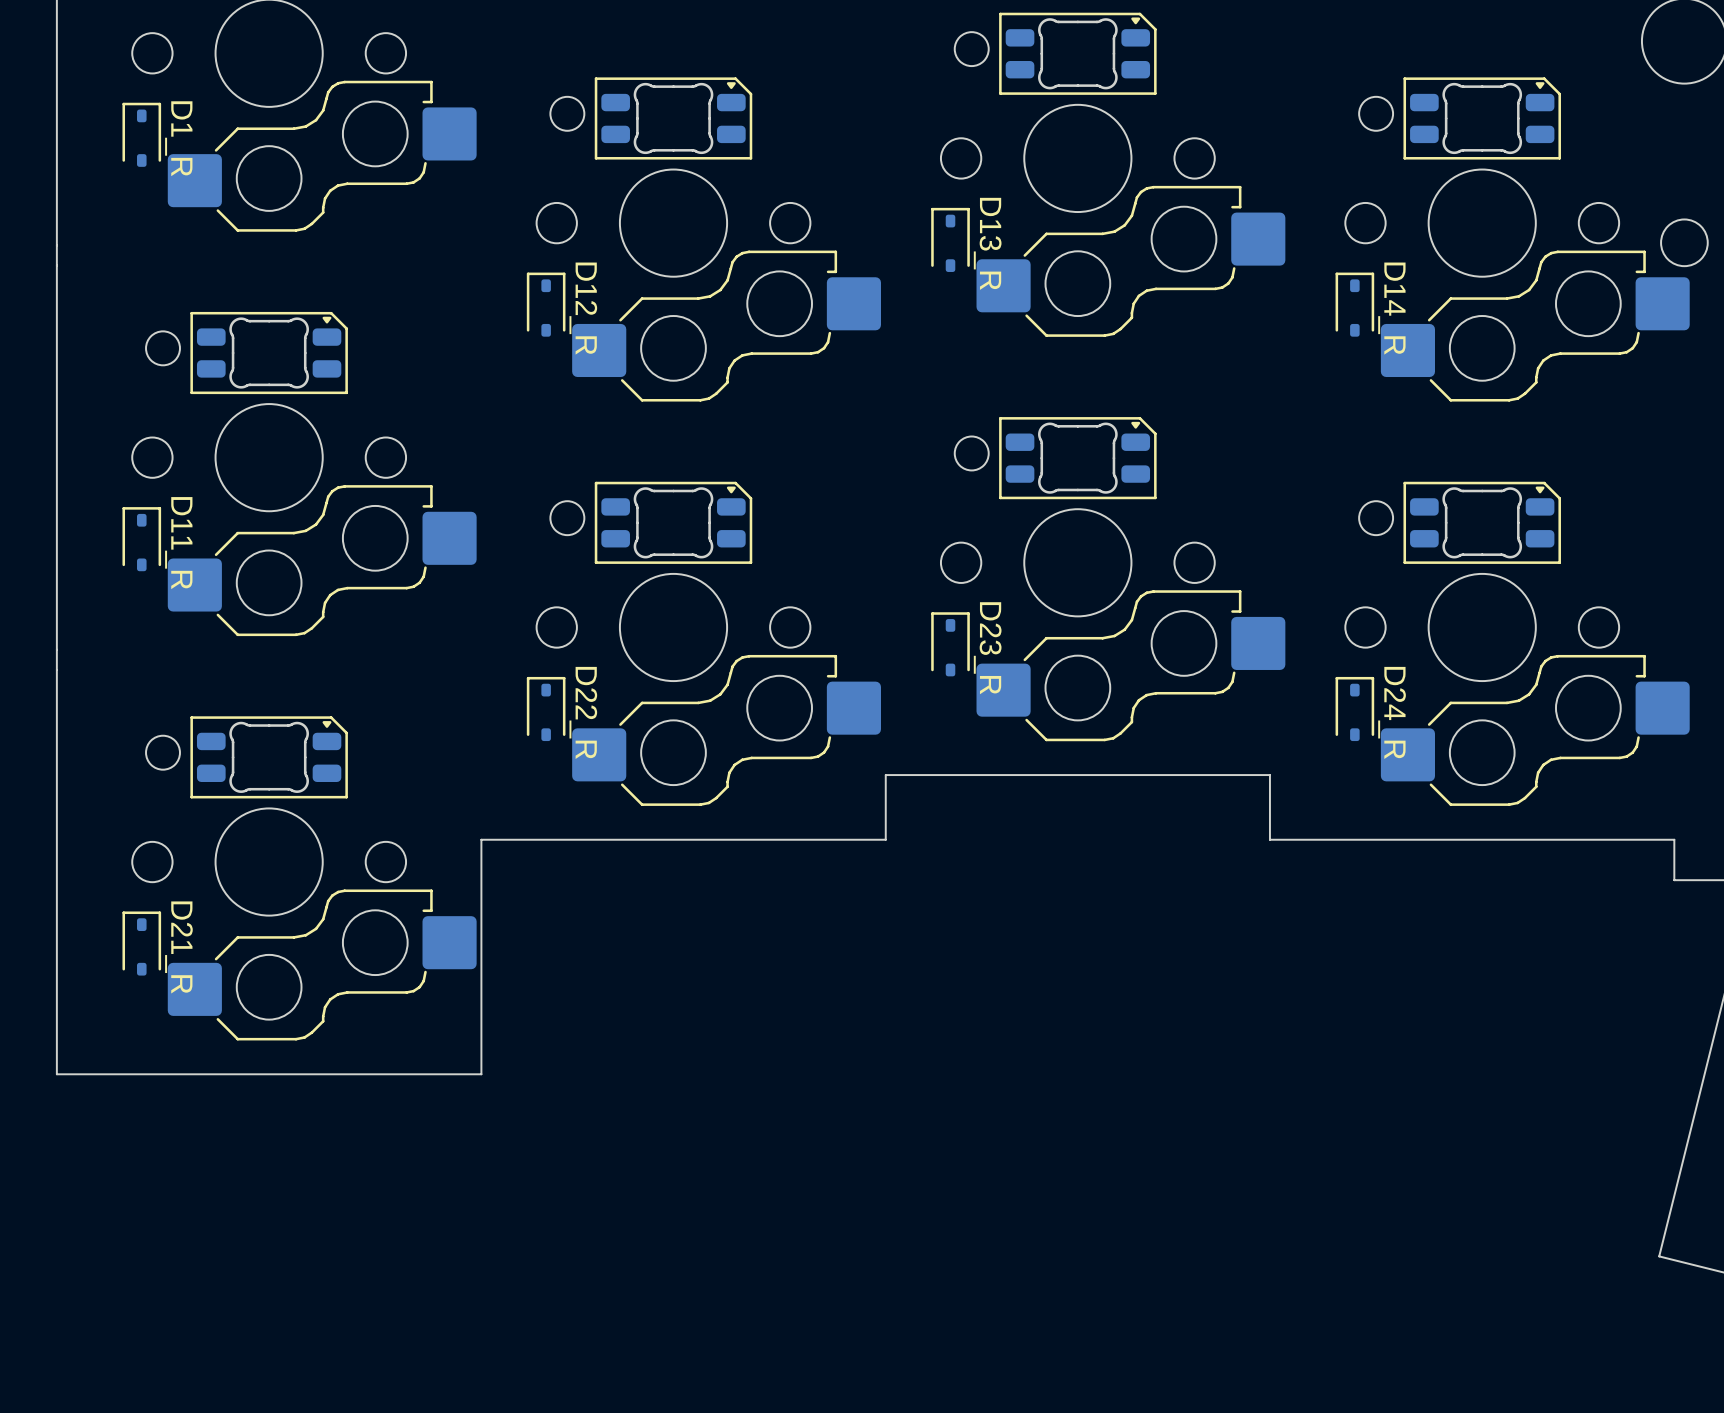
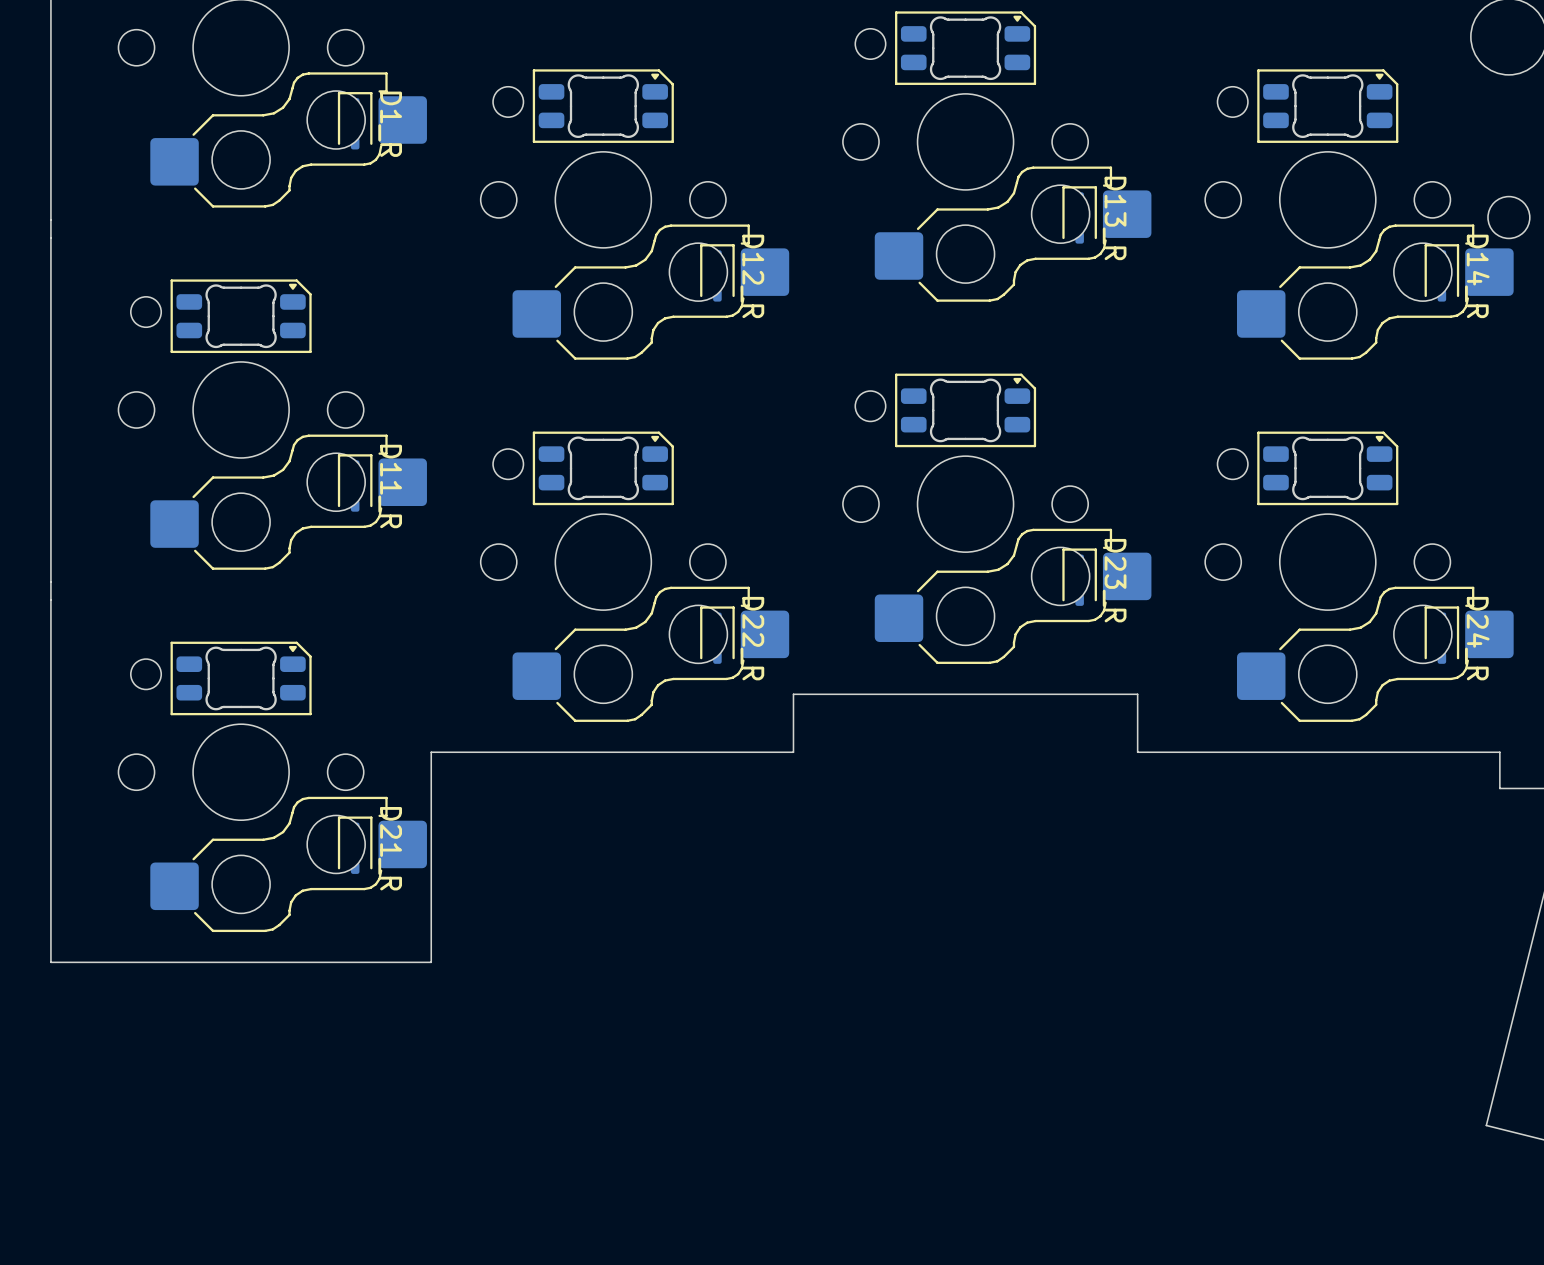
D1_R position: (141, 134) -> (355, 120)
D13_R position: (950, 239) -> (1079, 214)
D12_R position: (546, 304) -> (717, 272)
D14_R position: (1354, 304) -> (1441, 272)
D11_R position: (141, 539) -> (355, 482)
D23_R position: (950, 644) -> (1079, 577)
D22_R position: (546, 708) -> (717, 635)
D24_R position: (1354, 708) -> (1441, 635)
D21_R position: (141, 943) -> (355, 845)

